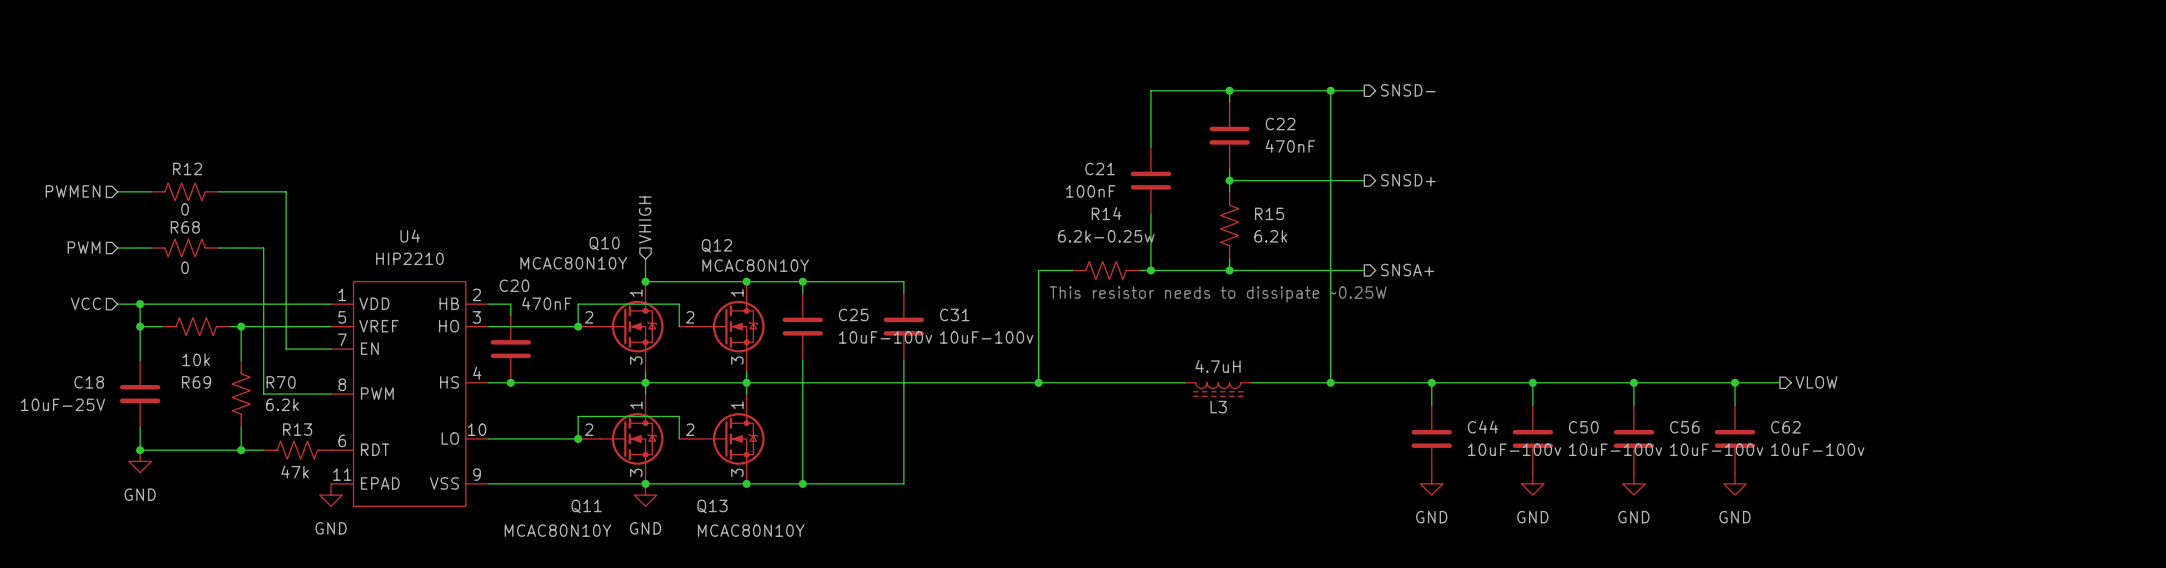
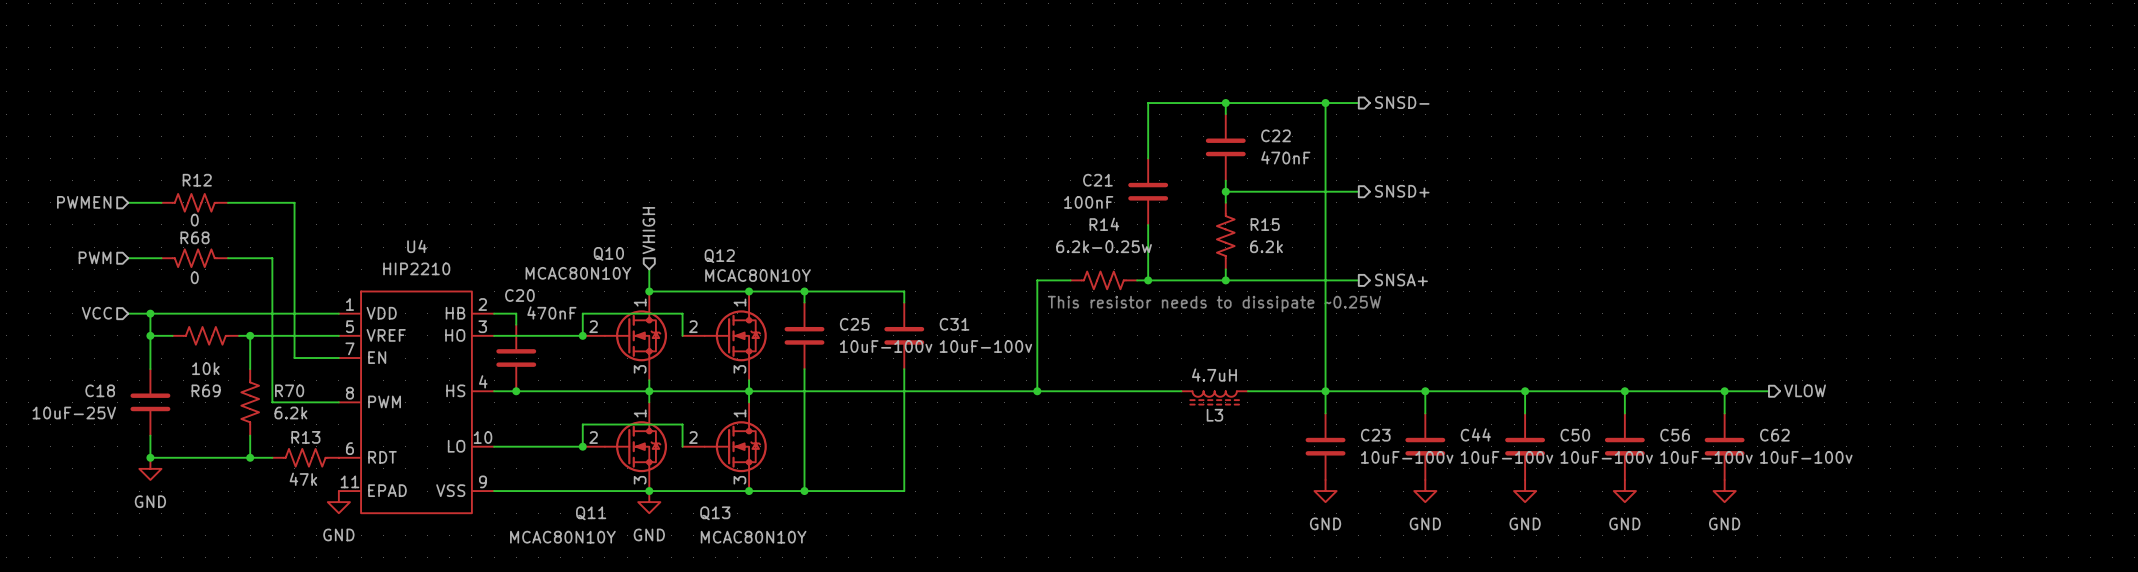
wire: none -> (1325, 391) (1325, 413)
C23: none -> 10uF-100v (1325, 446)
power symbol: none -> GND (1325, 491)

